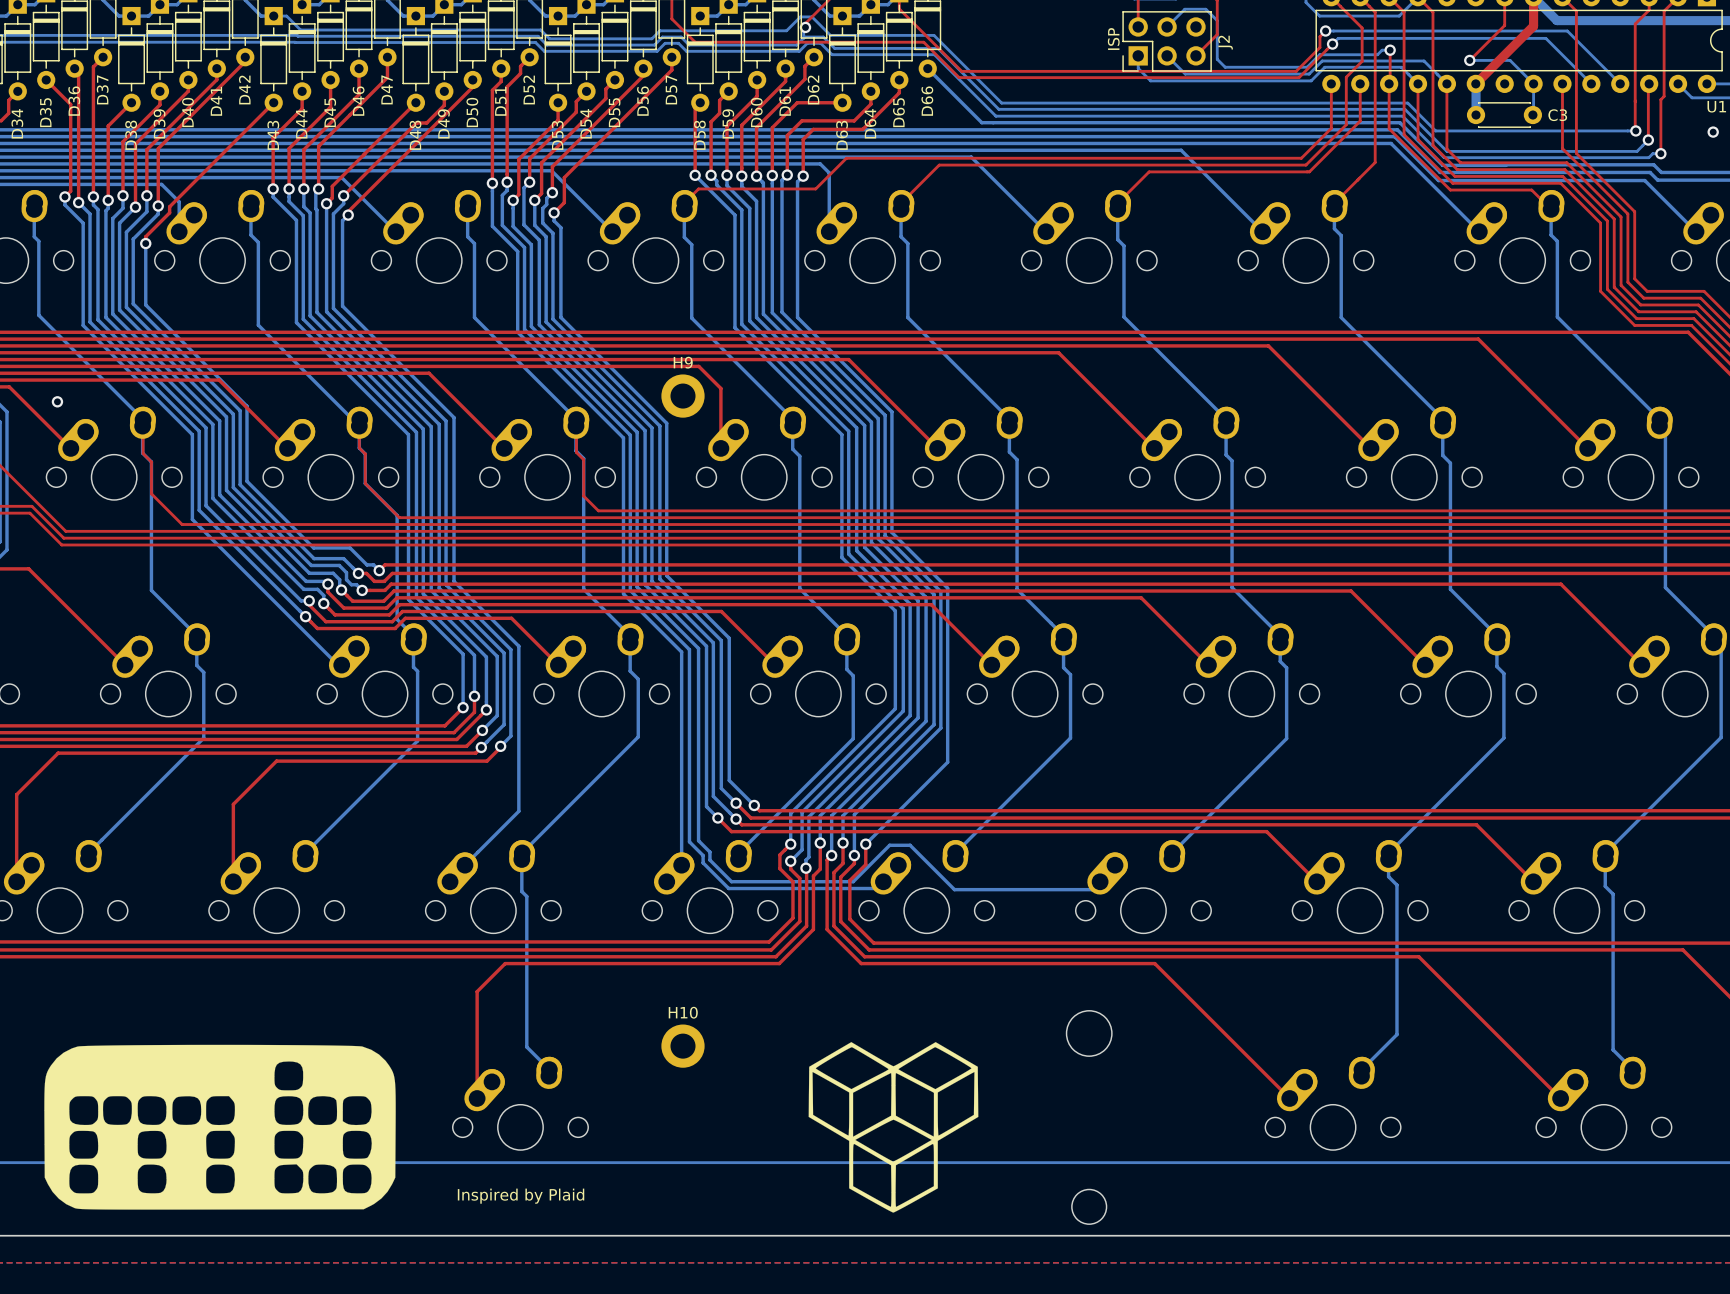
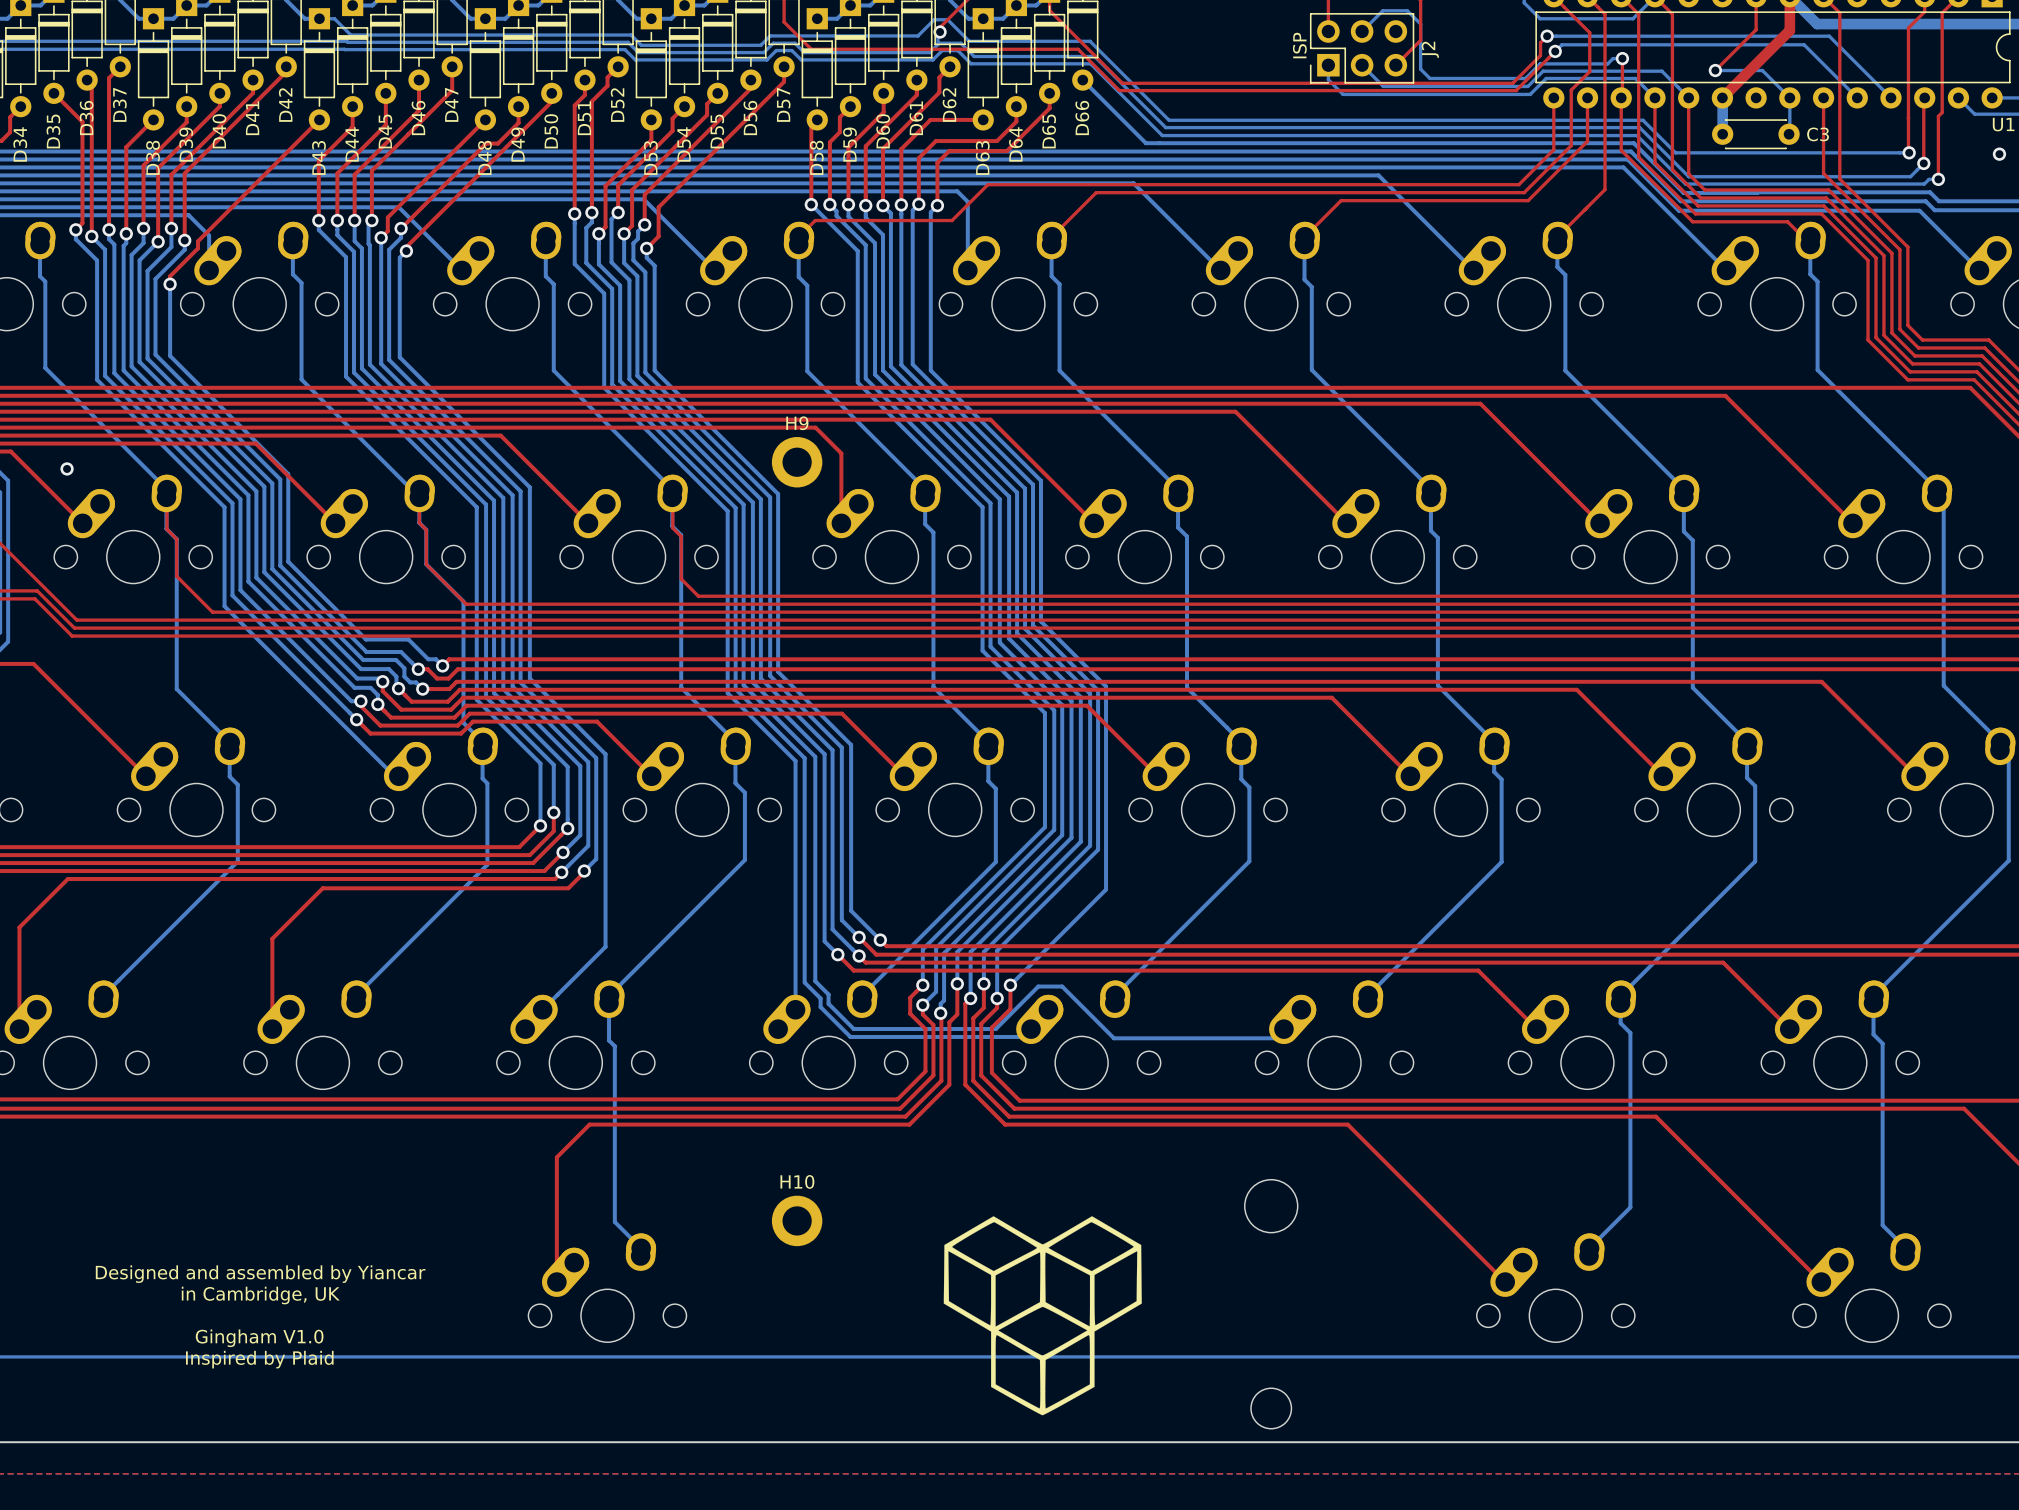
drawing: [44, 1044, 396, 1210] -> none
text: none -> Designed and assembled by Yiancar (260, 1274)
text: none -> in Cambridge, UK (260, 1295)
text: none -> Gingham V1.0 (259, 1338)
text: none -> Inspired by Plaid (259, 1359)
text: Inspired by Plaid (521, 1196) -> none

